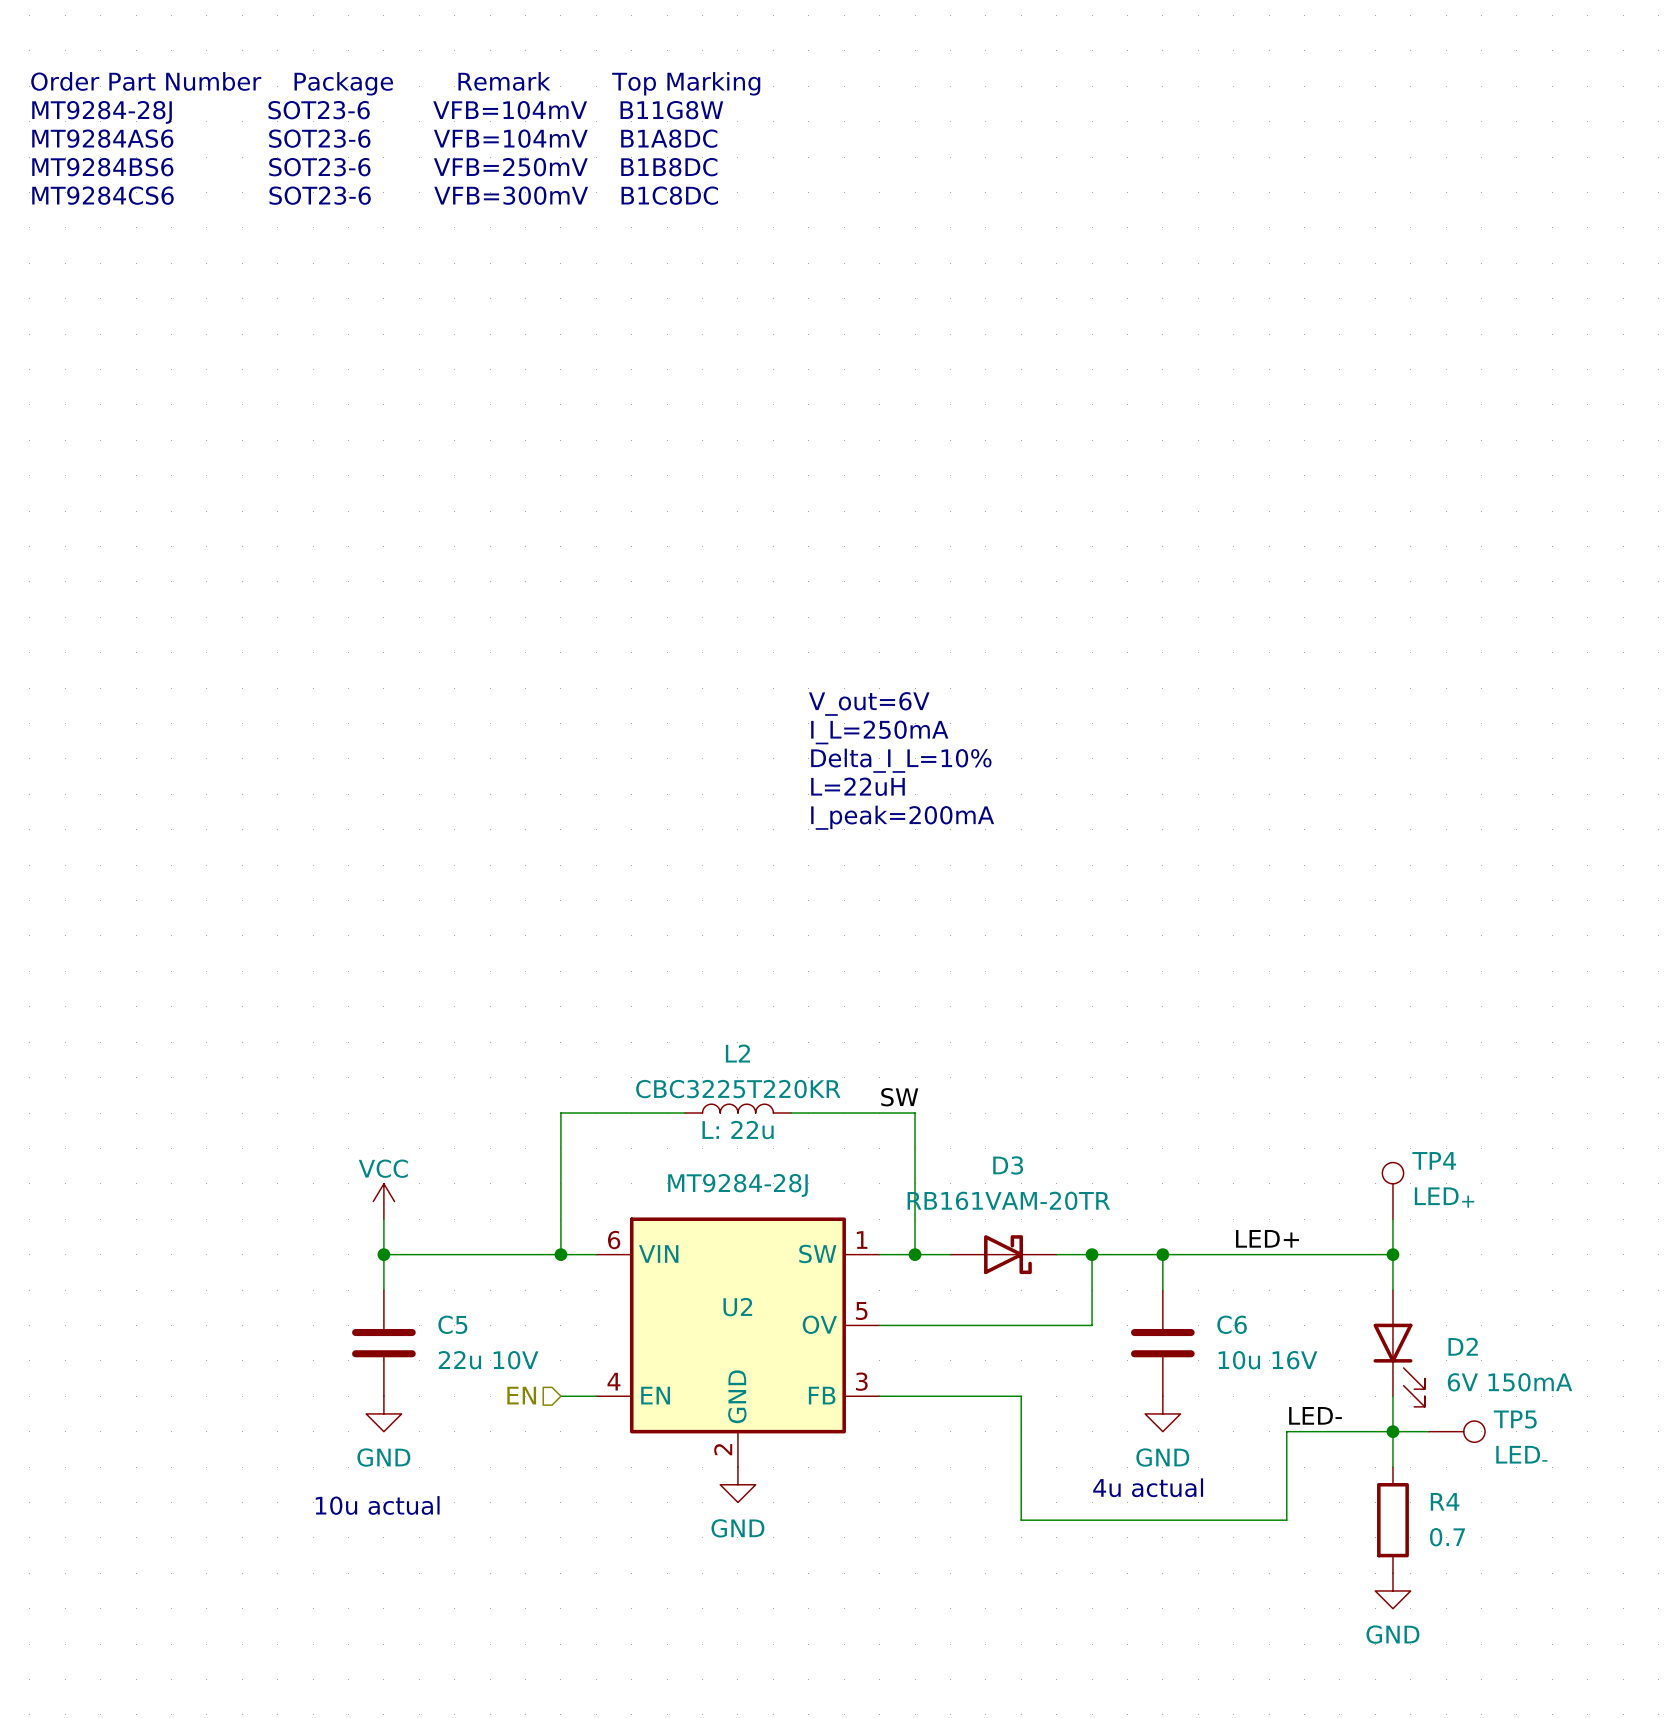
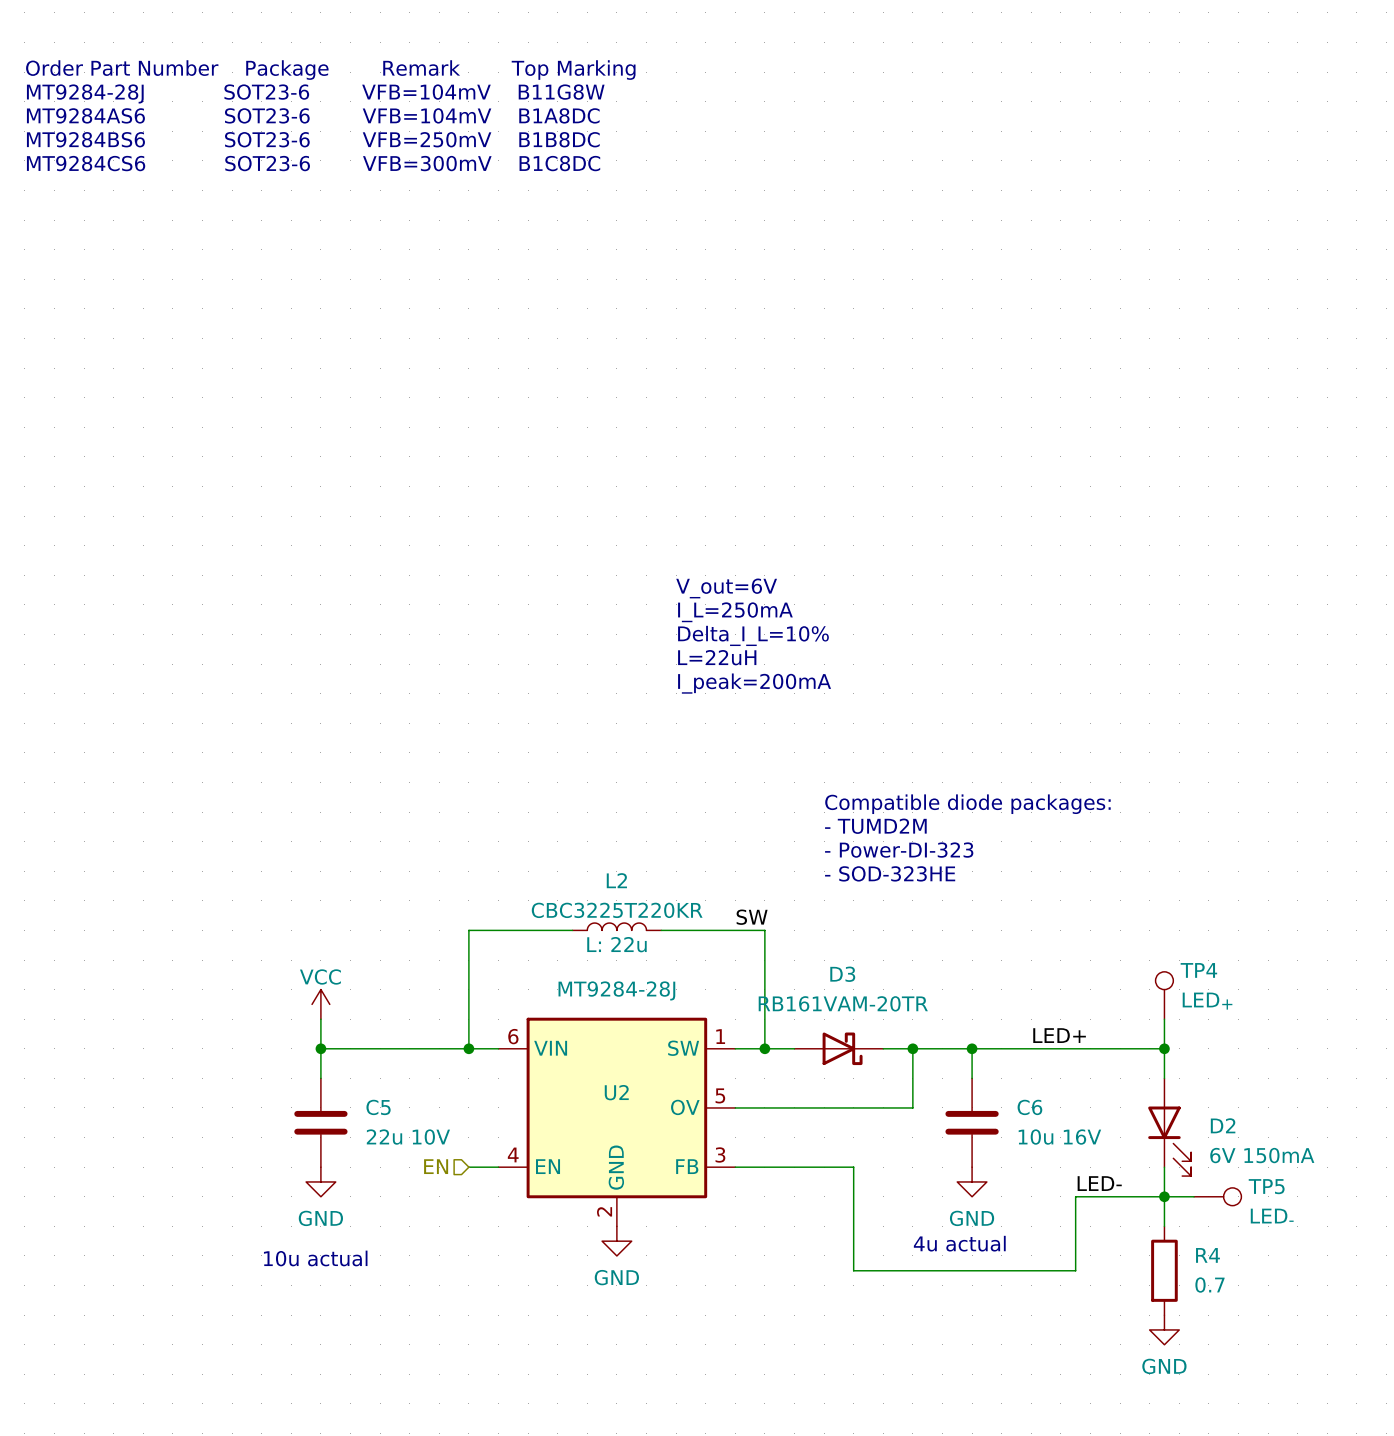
text: none -> Compatible diode packages: (967, 804)
text: none -> - TUMD2M (875, 826)
text: none -> - Power-DI-323 (899, 850)
text: none -> - SOD-323HE (890, 873)

